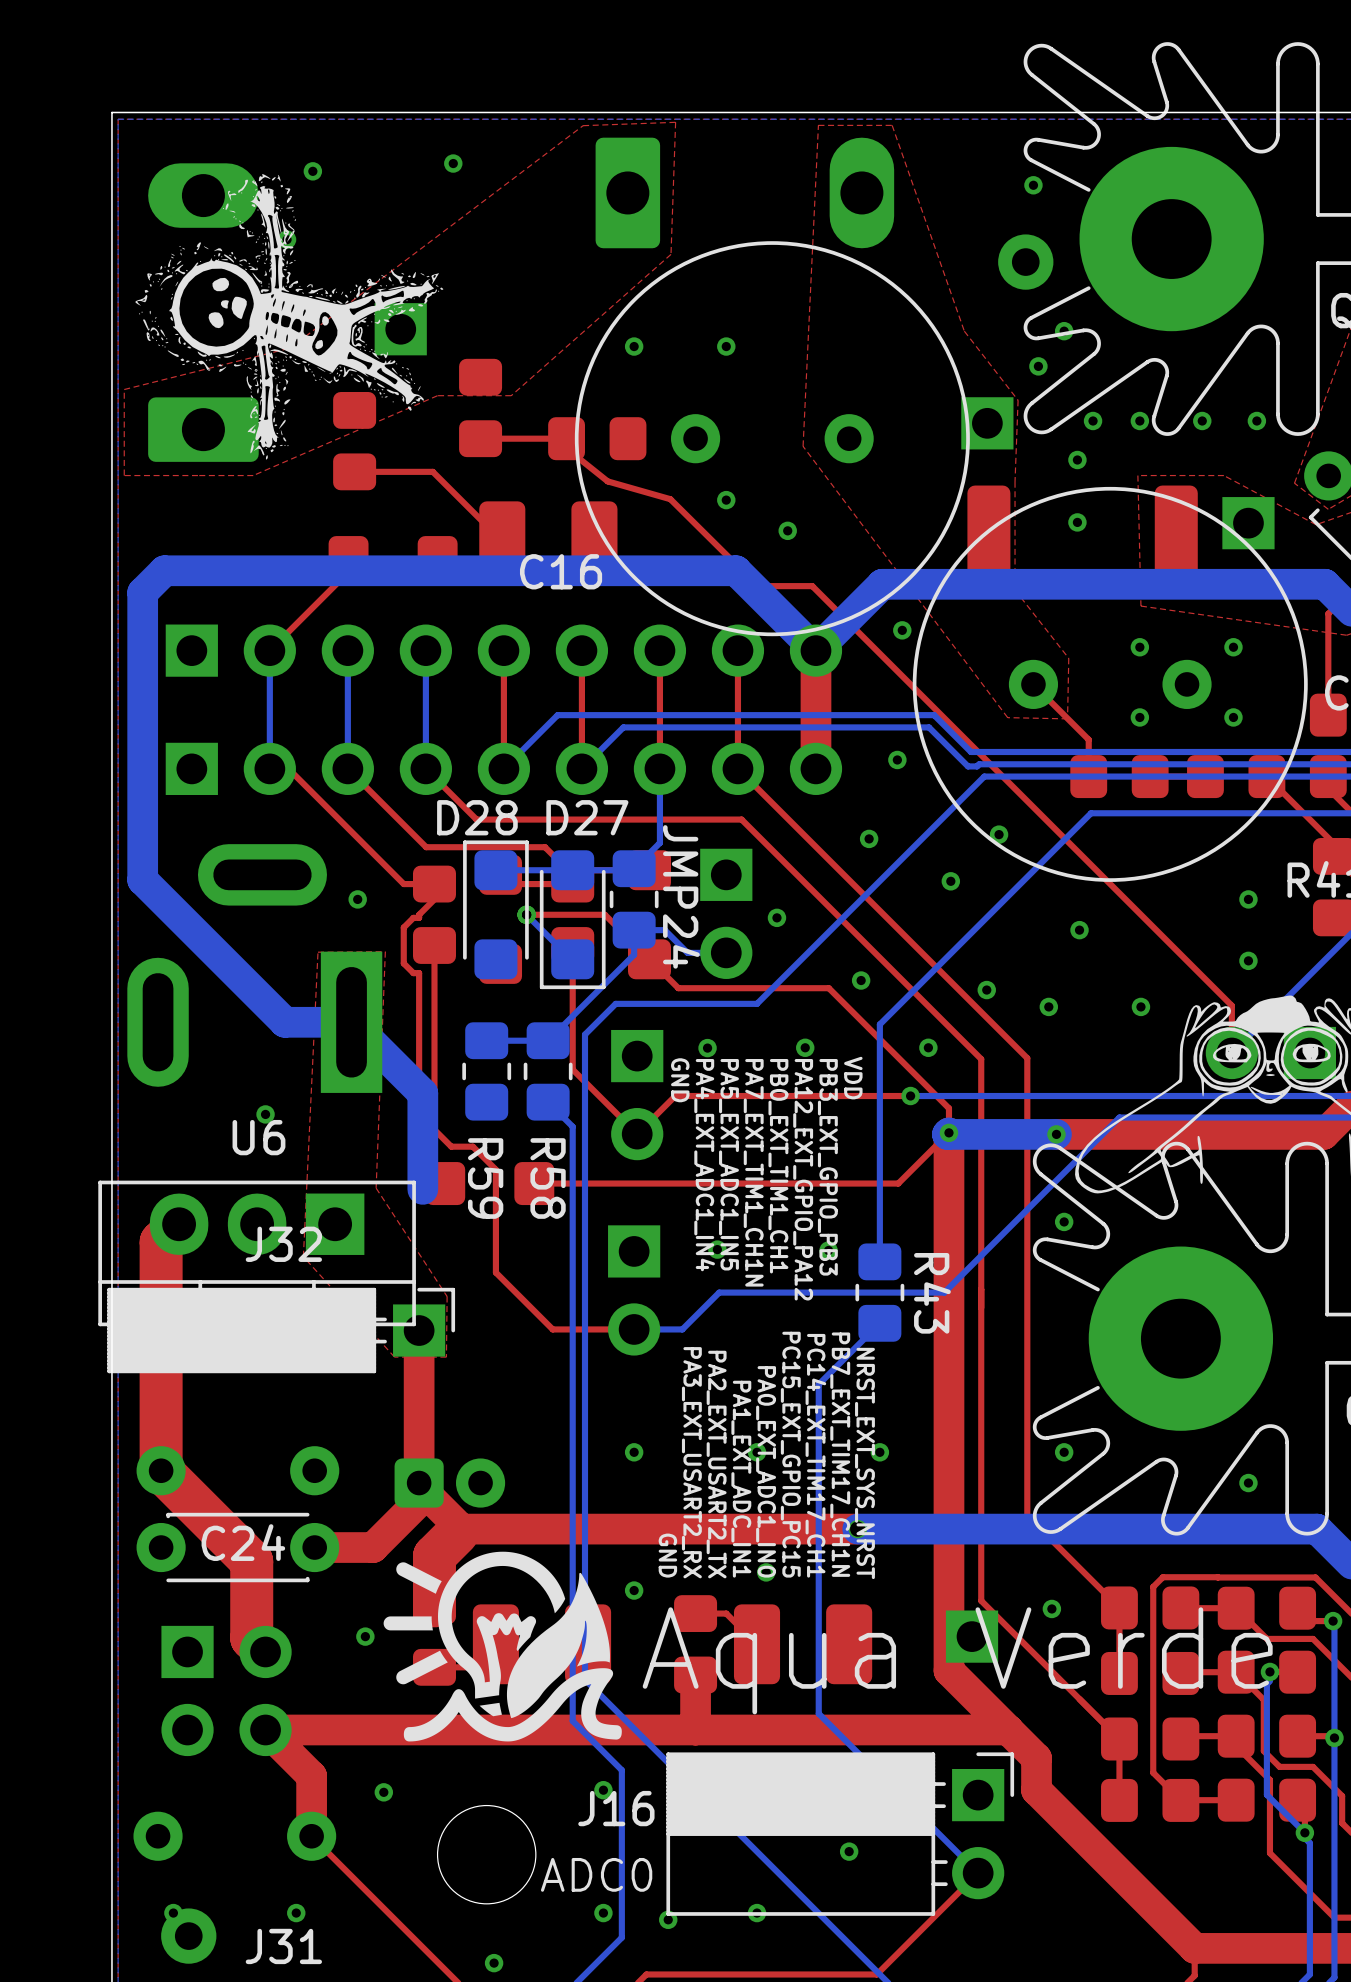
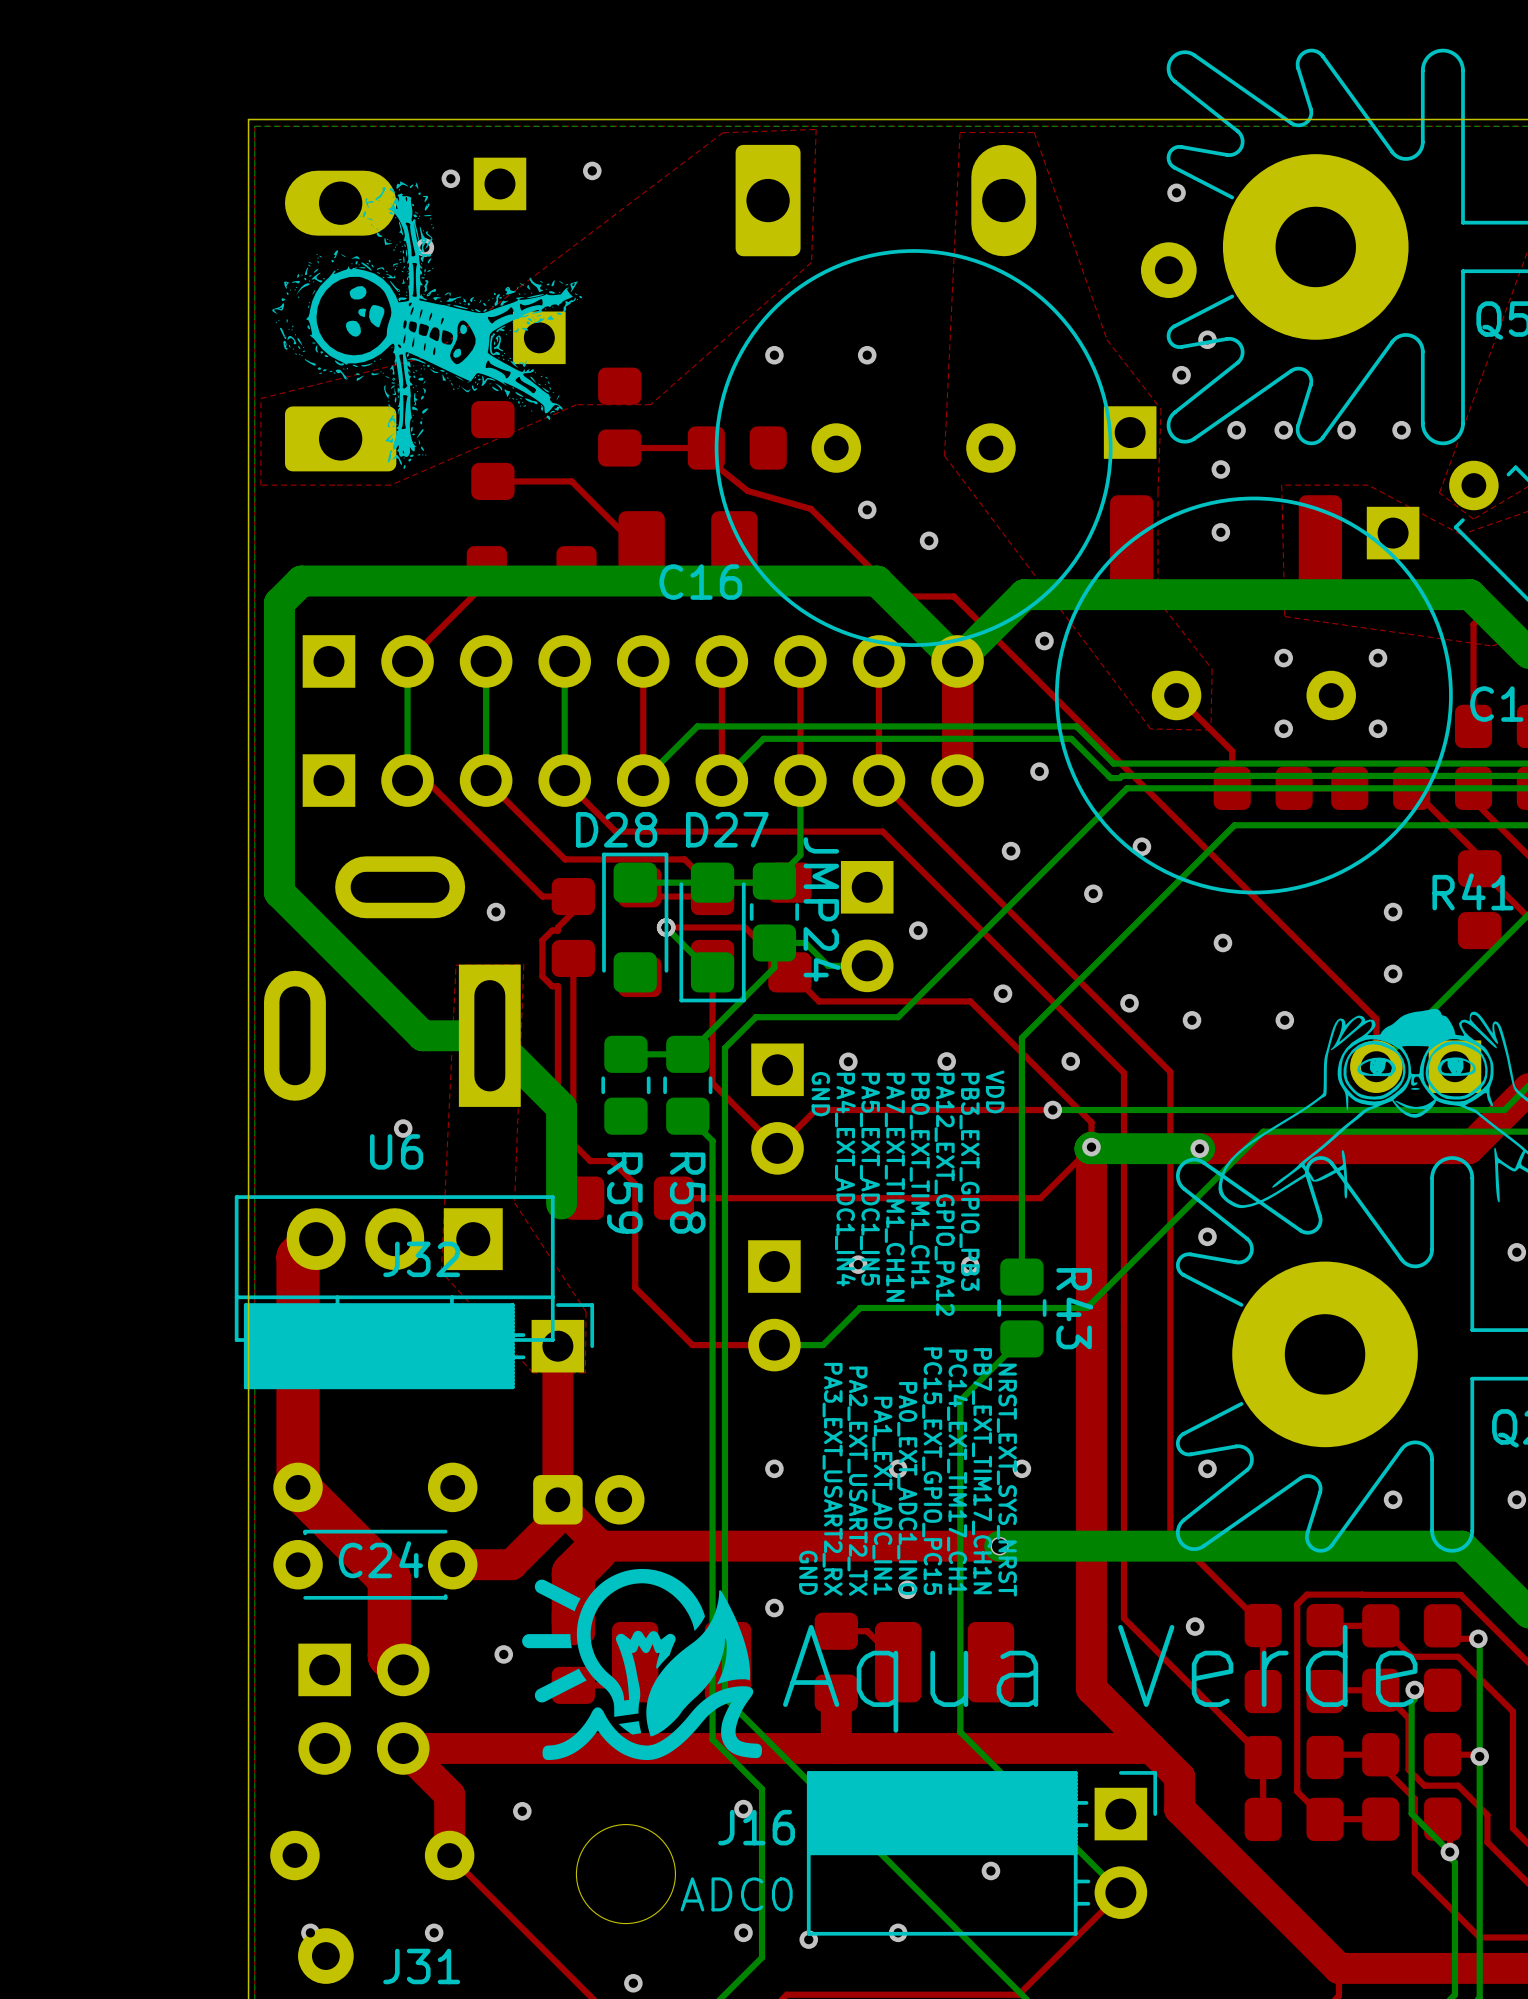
part: none -> (499, 183)
part: (972, 1636) -> none

